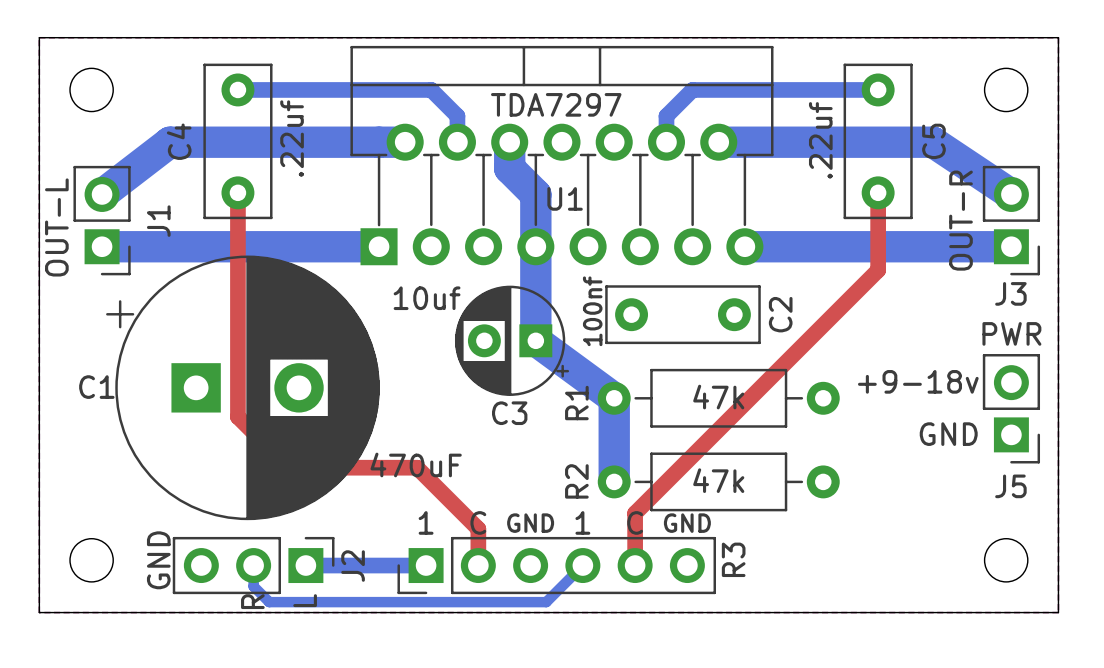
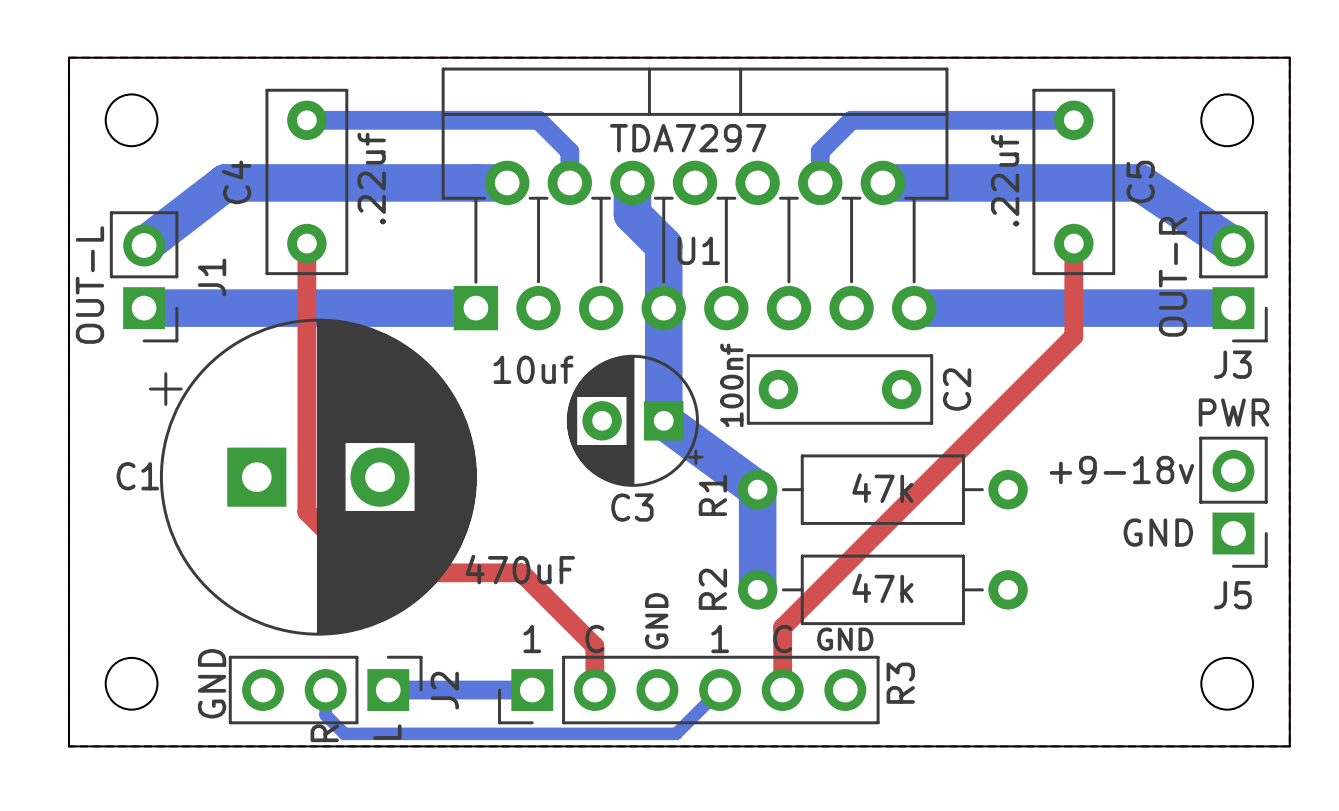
text rotation: 0° (530, 523) -> 90° counterclockwise (656, 621)

